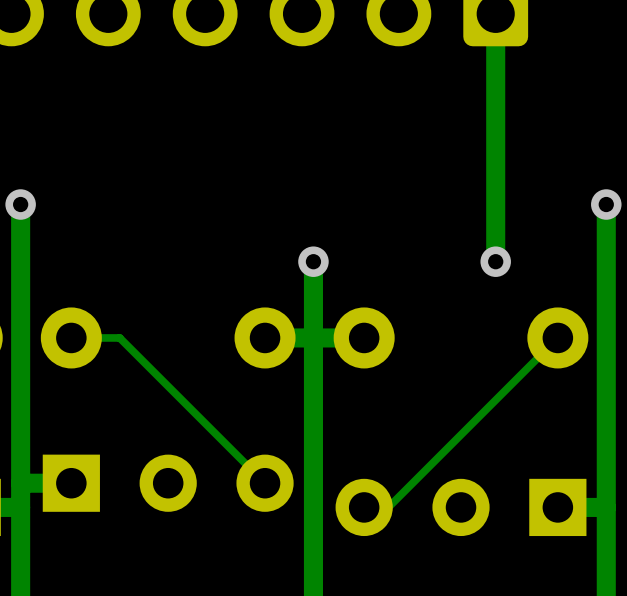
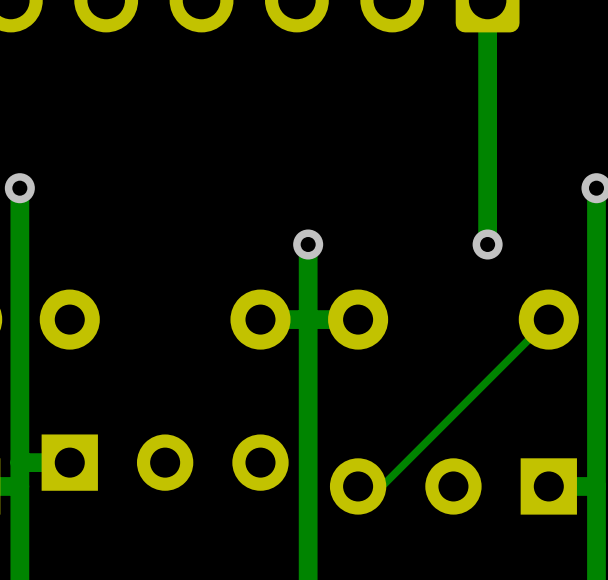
track: (71, 337) (119, 337) (265, 483) -> none

